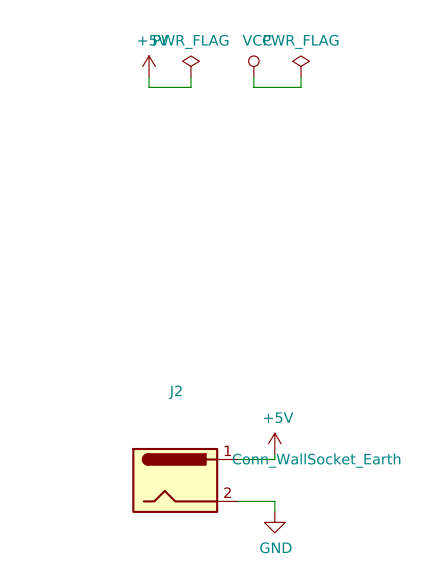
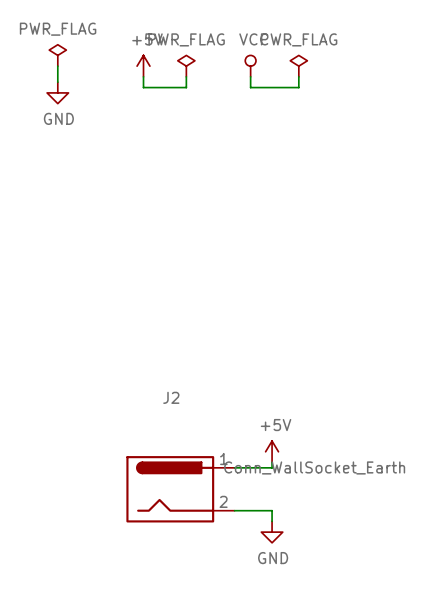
power symbol: none -> PWR_FLAG (57, 55)
wire: none -> (57, 66) (57, 82)
power symbol: none -> GND (57, 92)

